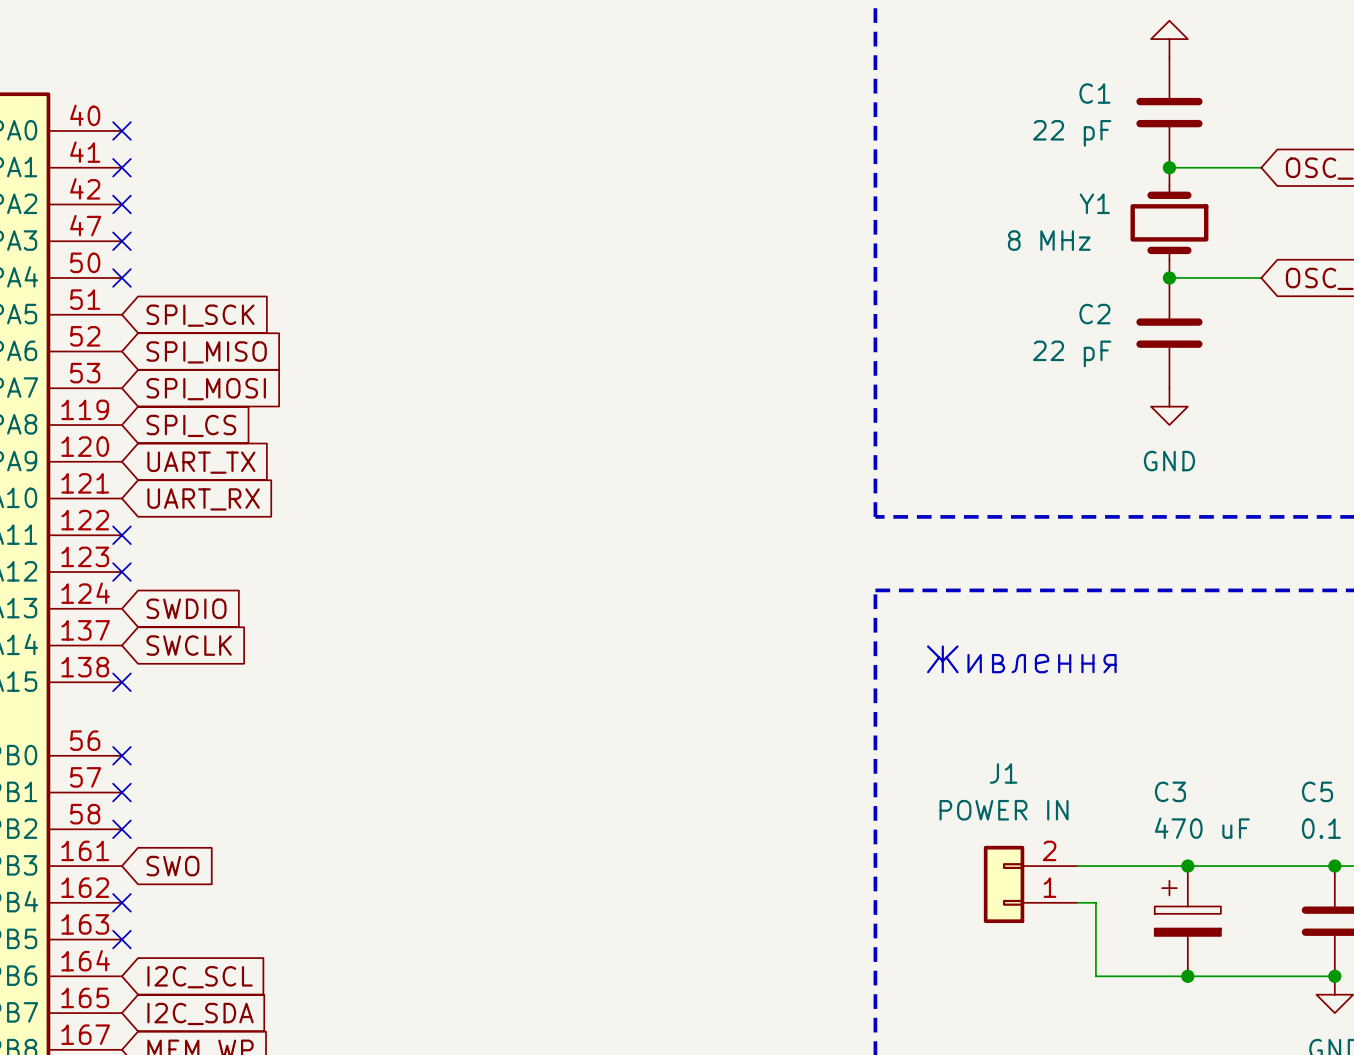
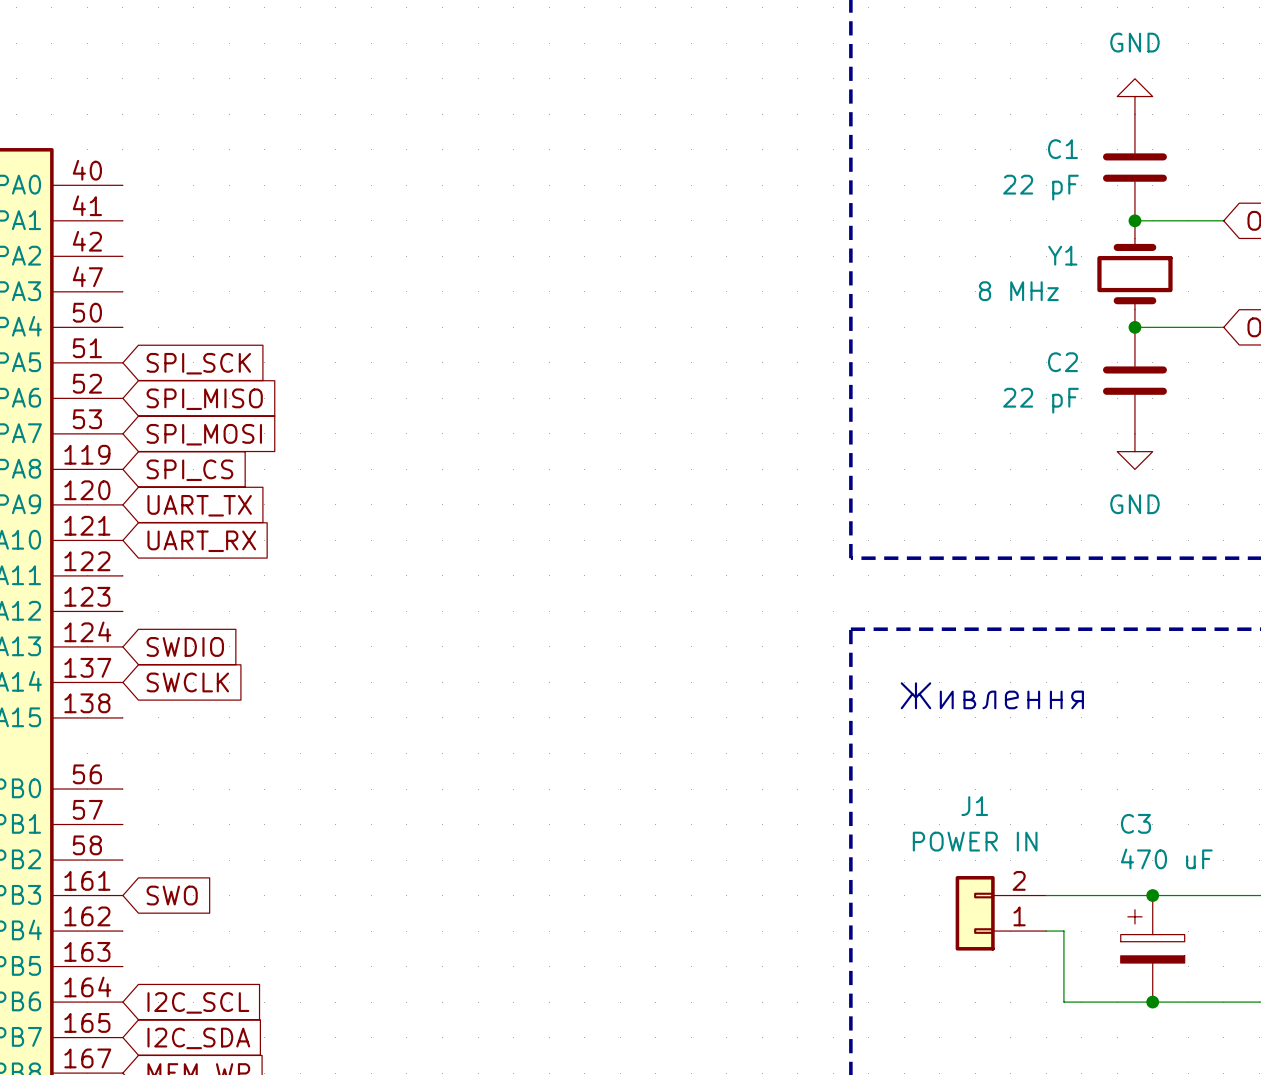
no-connect mark: (121, 130) -> none
no-connect mark: (121, 167) -> none
no-connect mark: (121, 204) -> none
no-connect mark: (121, 241) -> none
no-connect mark: (121, 278) -> none
no-connect mark: (121, 535) -> none
no-connect mark: (121, 572) -> none
no-connect mark: (121, 682) -> none
no-connect mark: (121, 755) -> none
no-connect mark: (121, 792) -> none
no-connect mark: (121, 829) -> none
no-connect mark: (121, 902) -> none
no-connect mark: (121, 939) -> none

